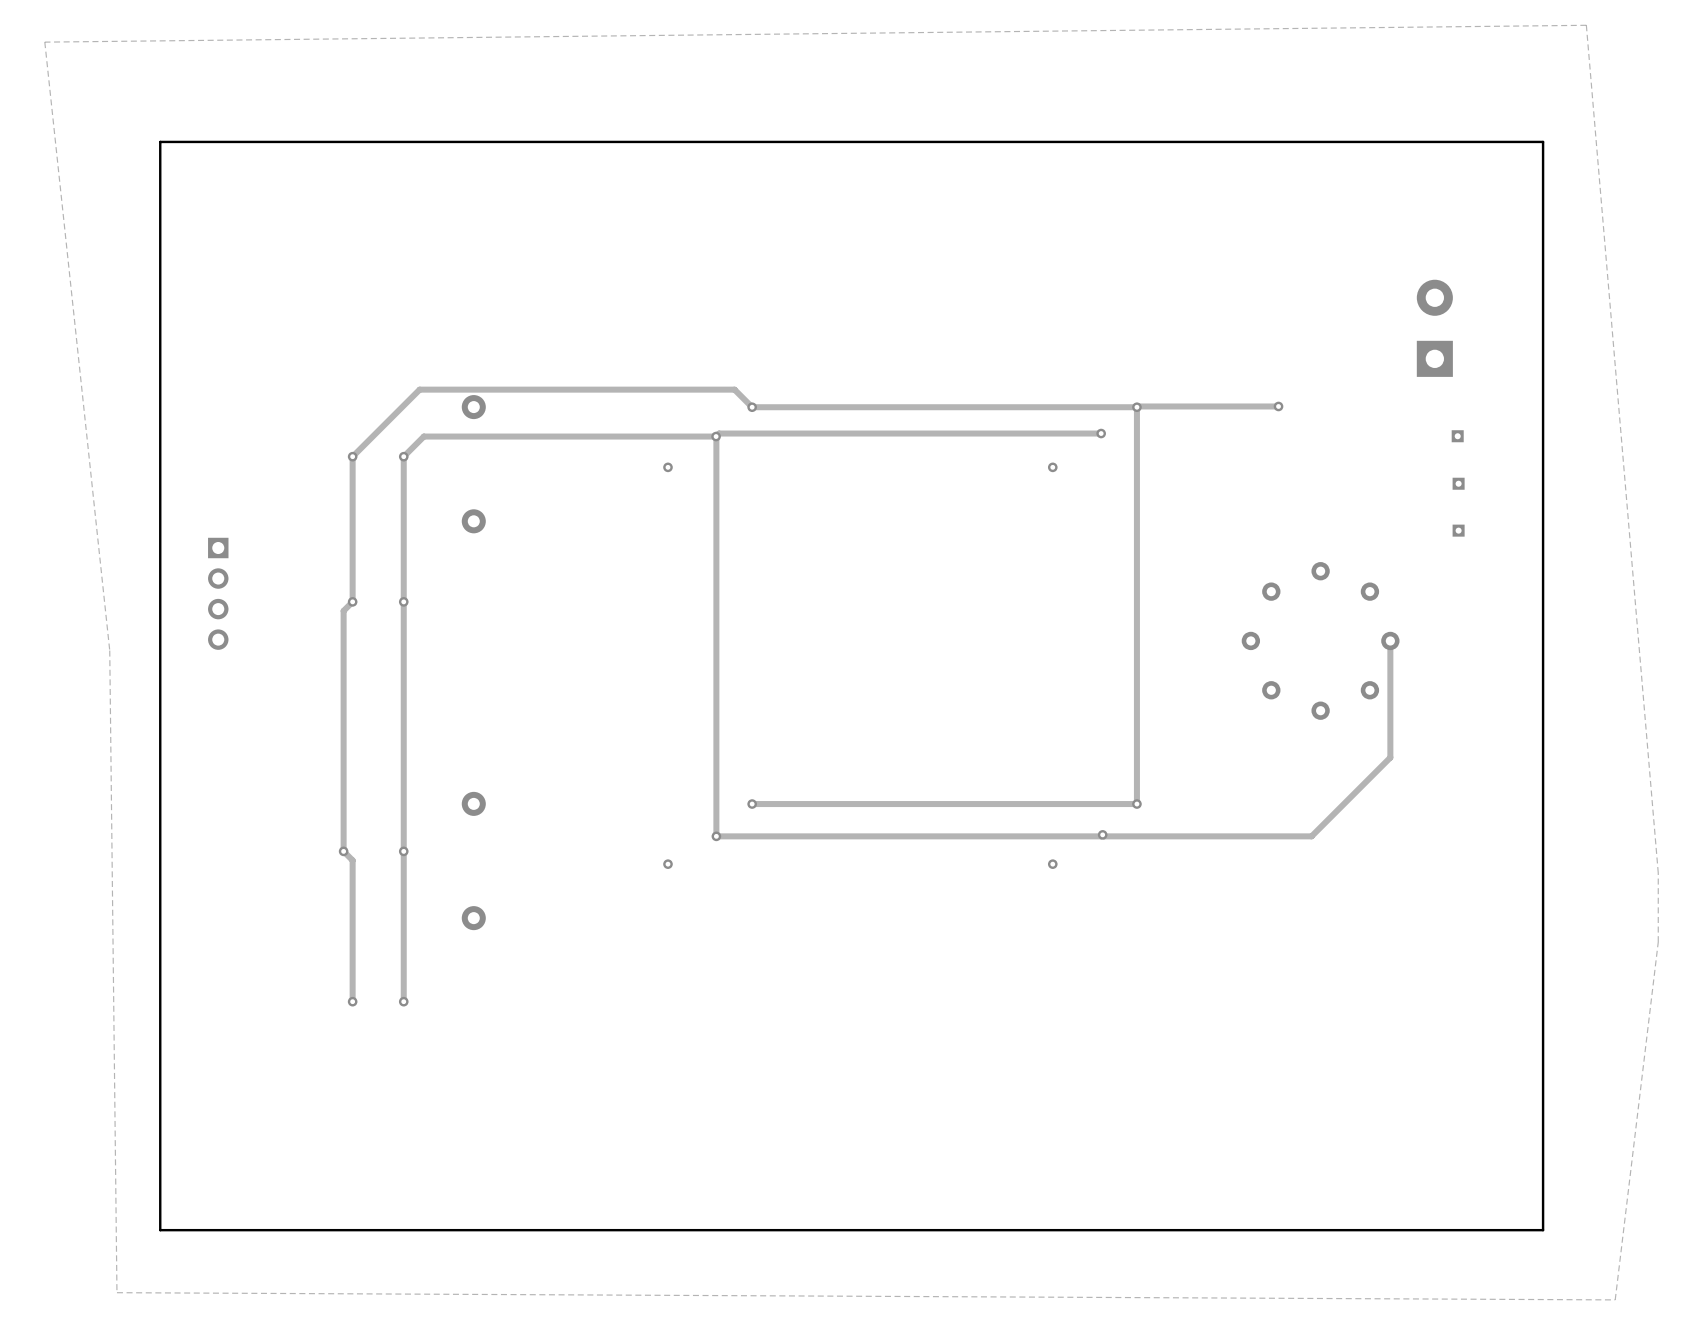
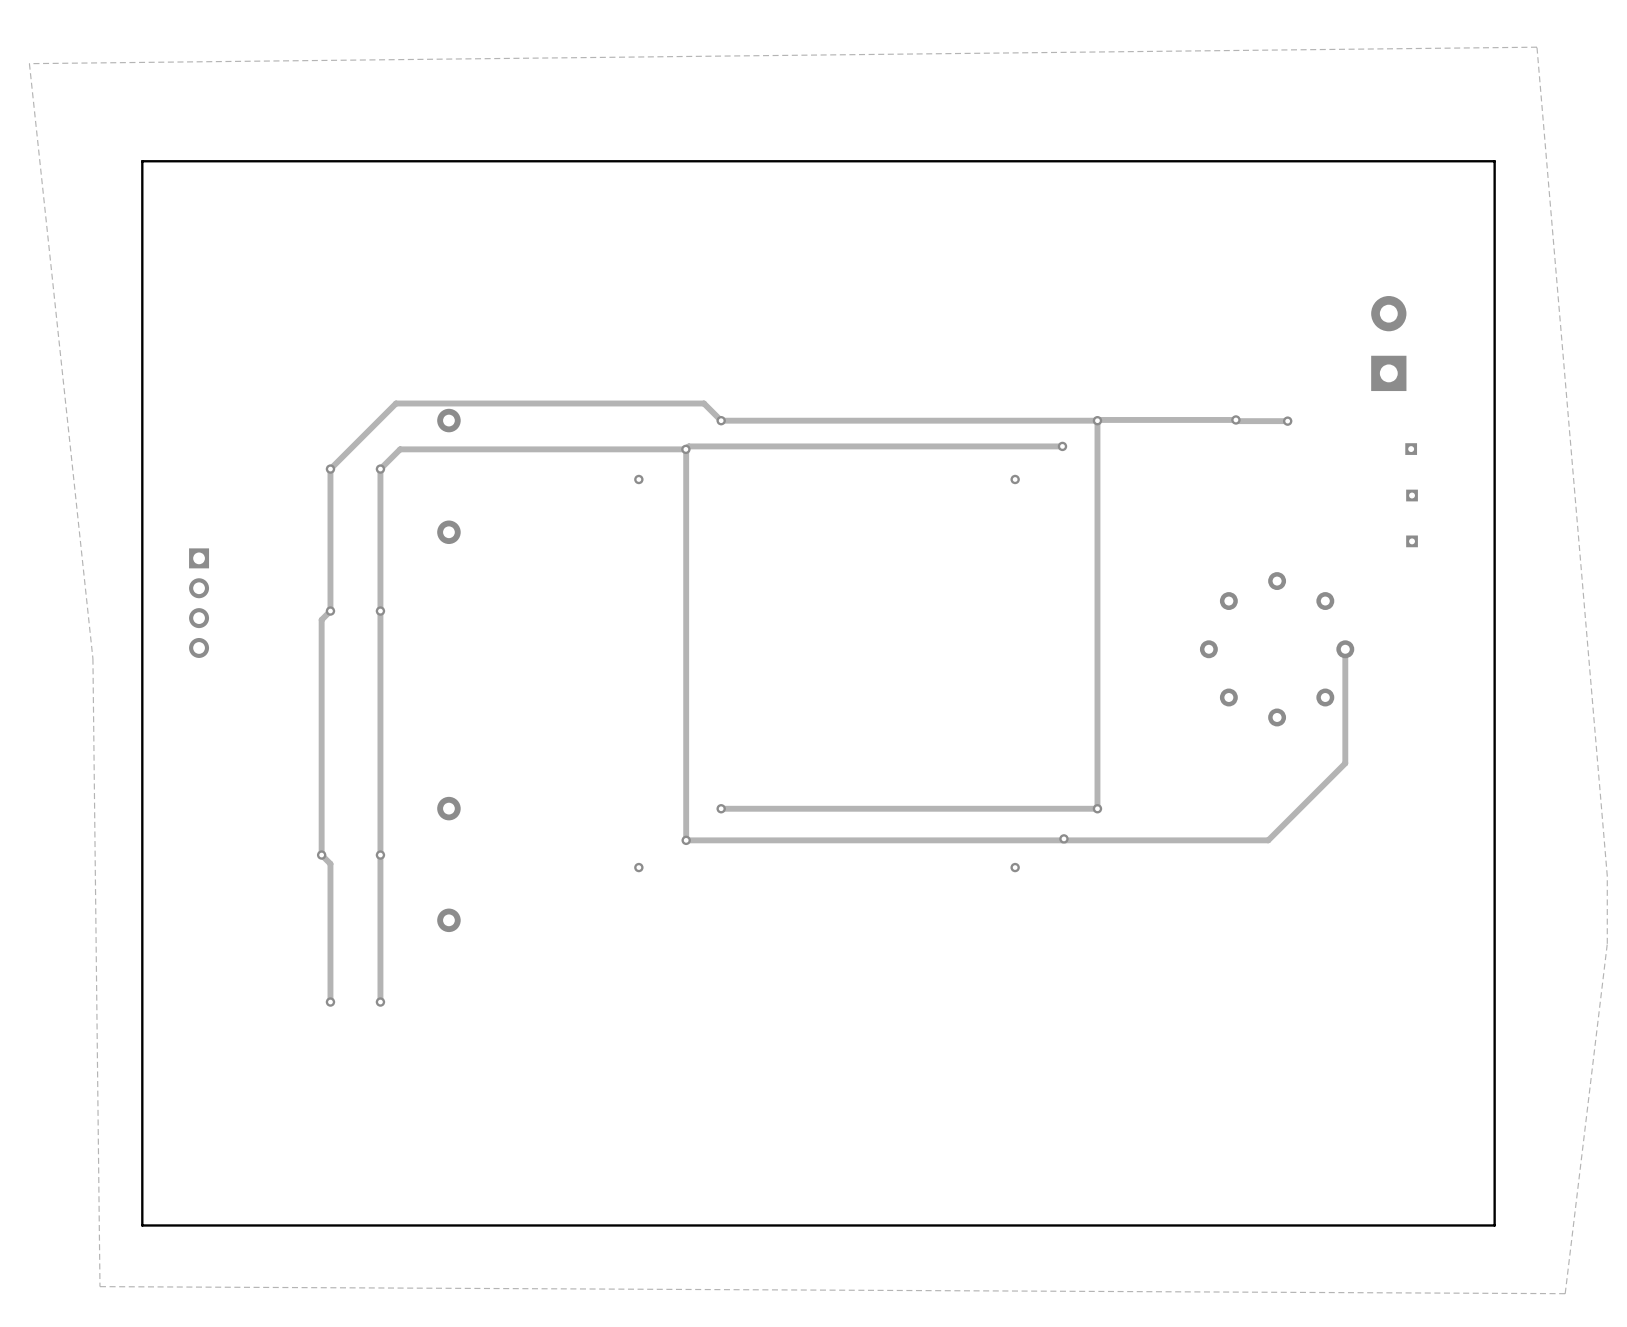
track: none -> (1235, 419) (1287, 421)
via: none -> (1287, 421)

